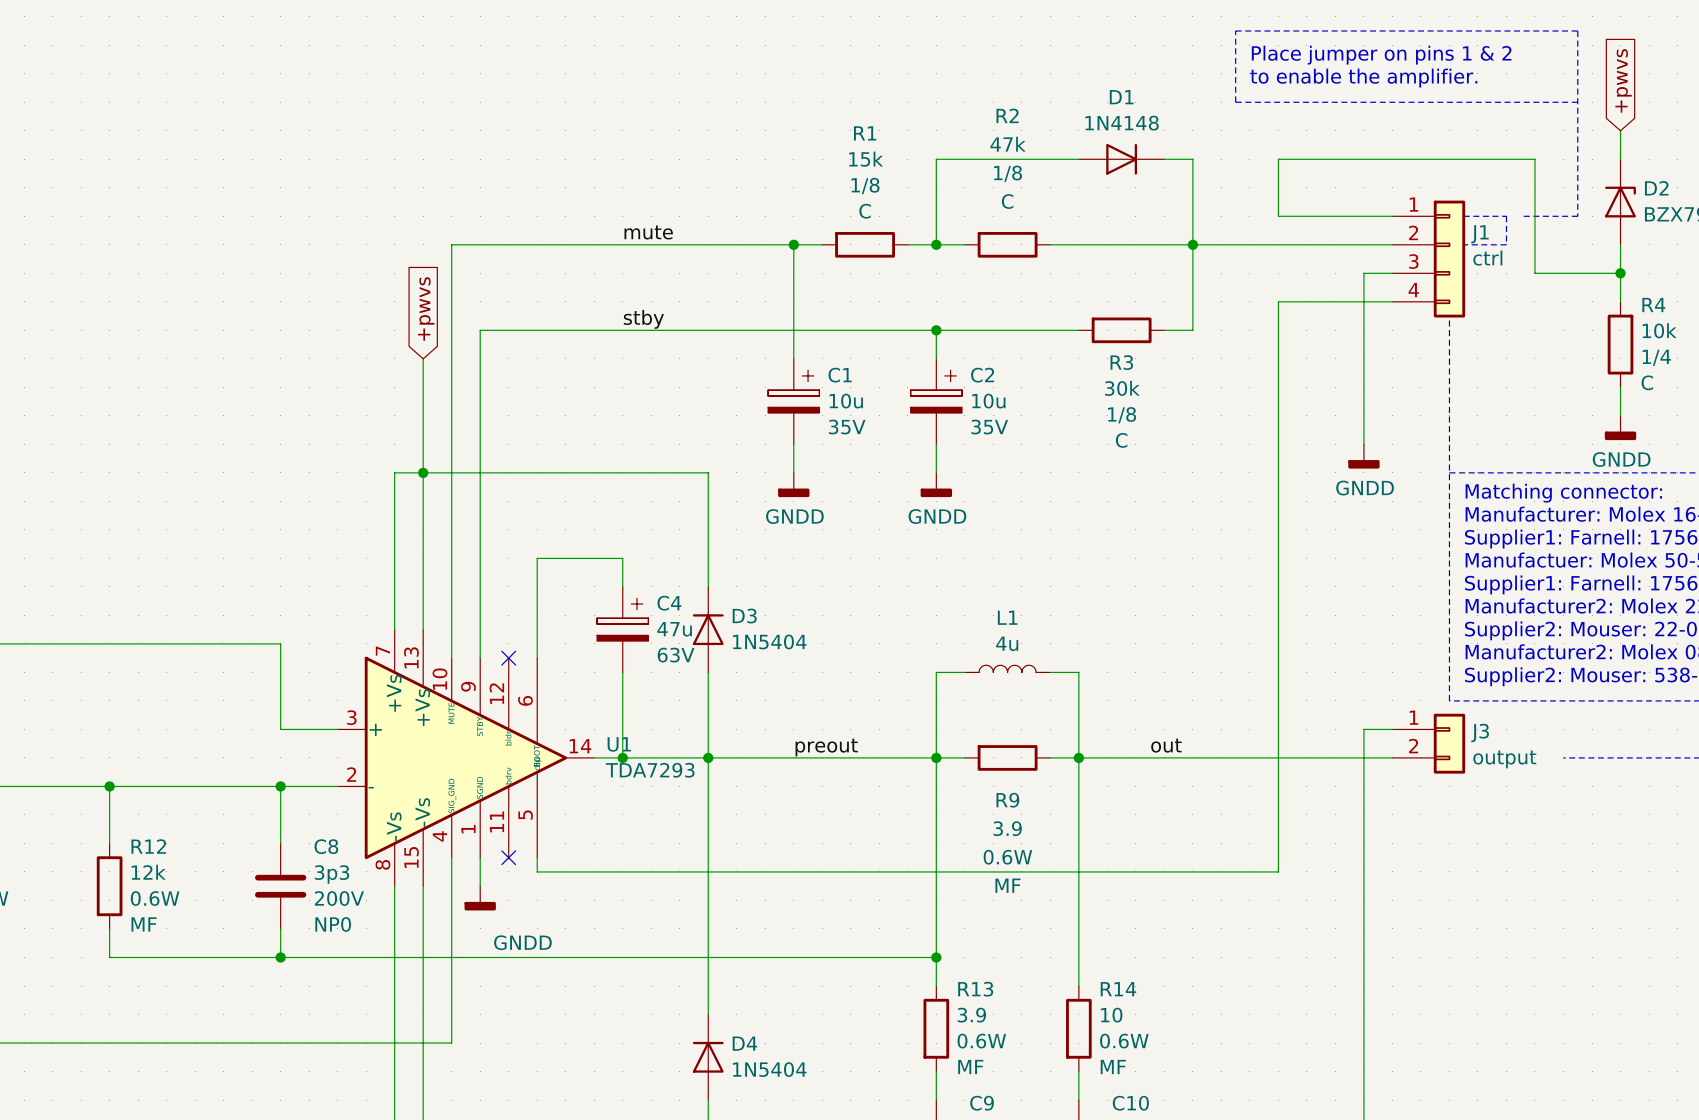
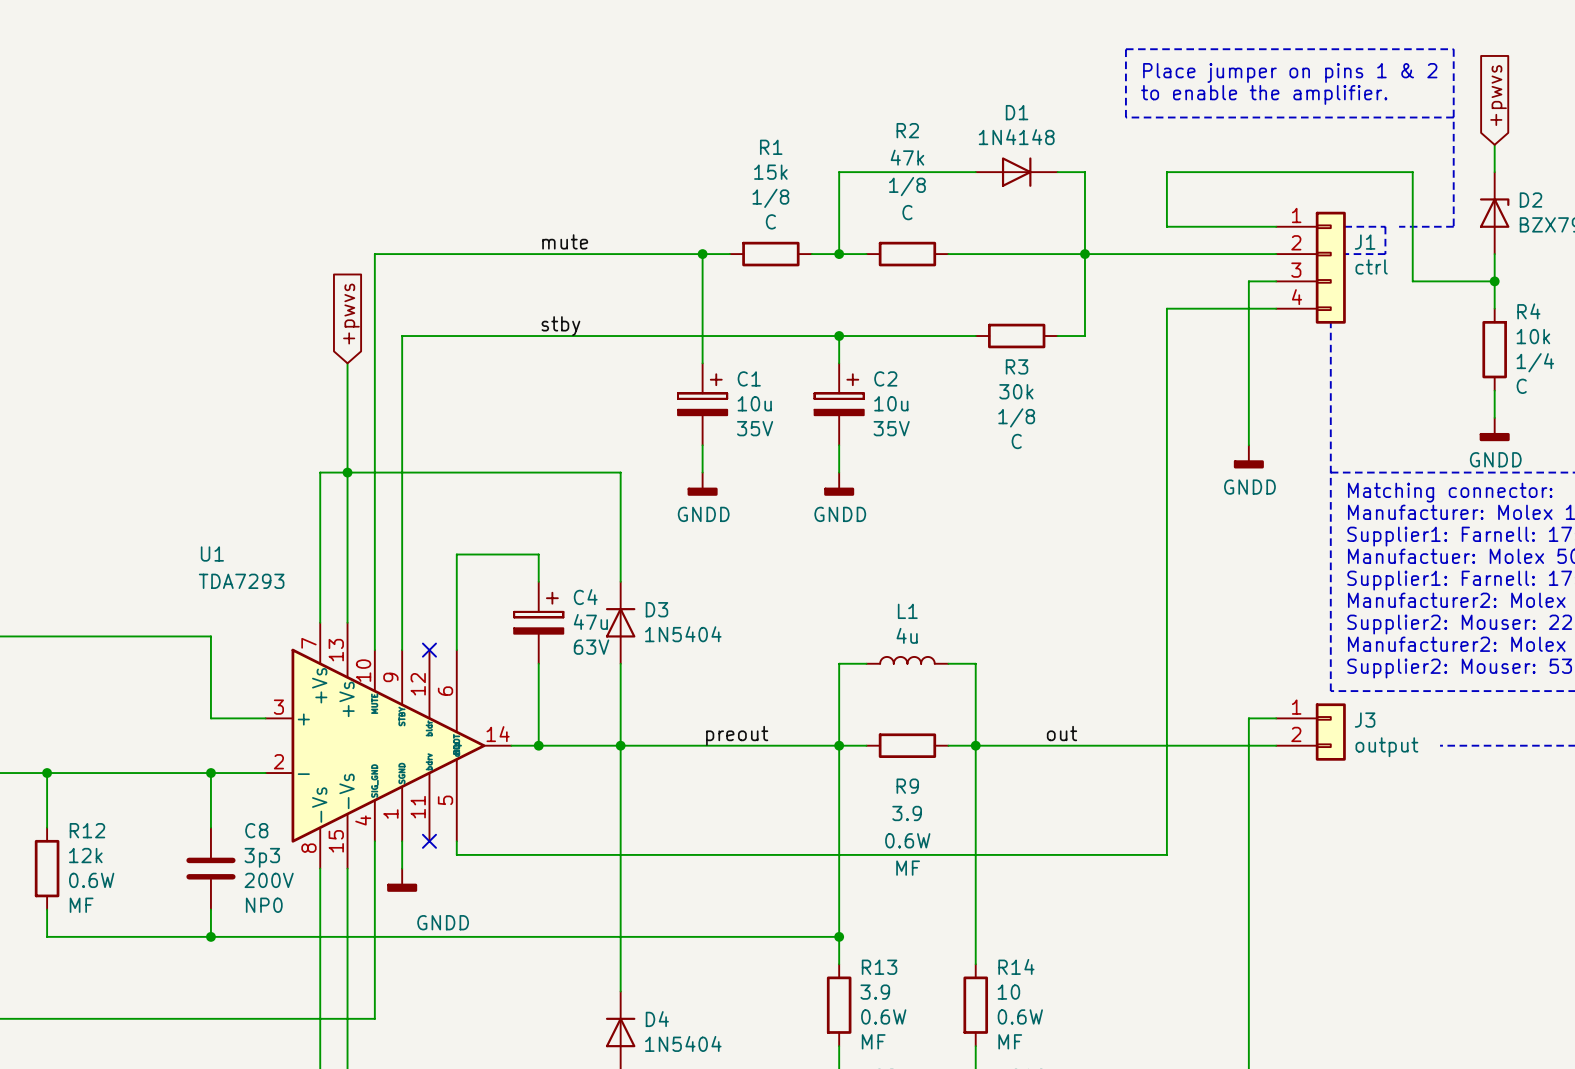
U1 name position: U1 (619, 744) -> U1 (212, 554)
U1 value position: TDA7293 (650, 770) -> TDA7293 (241, 581)

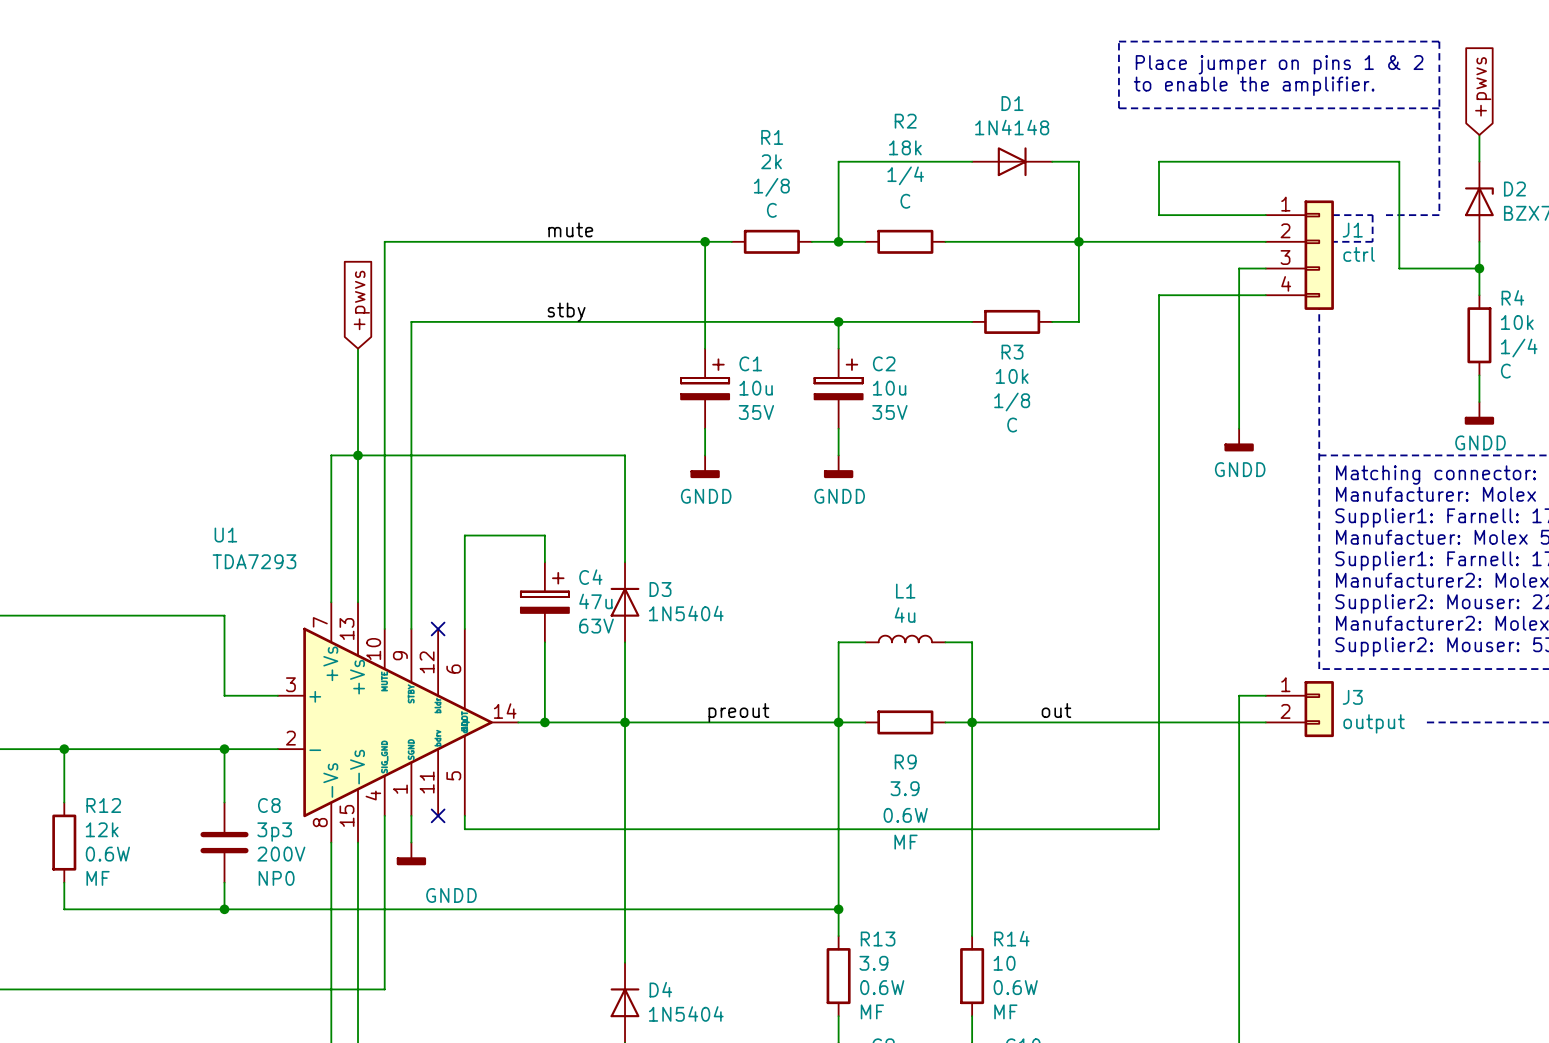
R2 value: 47k (907, 157) -> 18k (905, 147)
R1 value: 15k (770, 172) -> 2k (771, 161)
R2 text: 1/8 (907, 186) -> 1/4 (905, 175)
R3 value: 30k (1016, 391) -> 10k (1012, 376)

